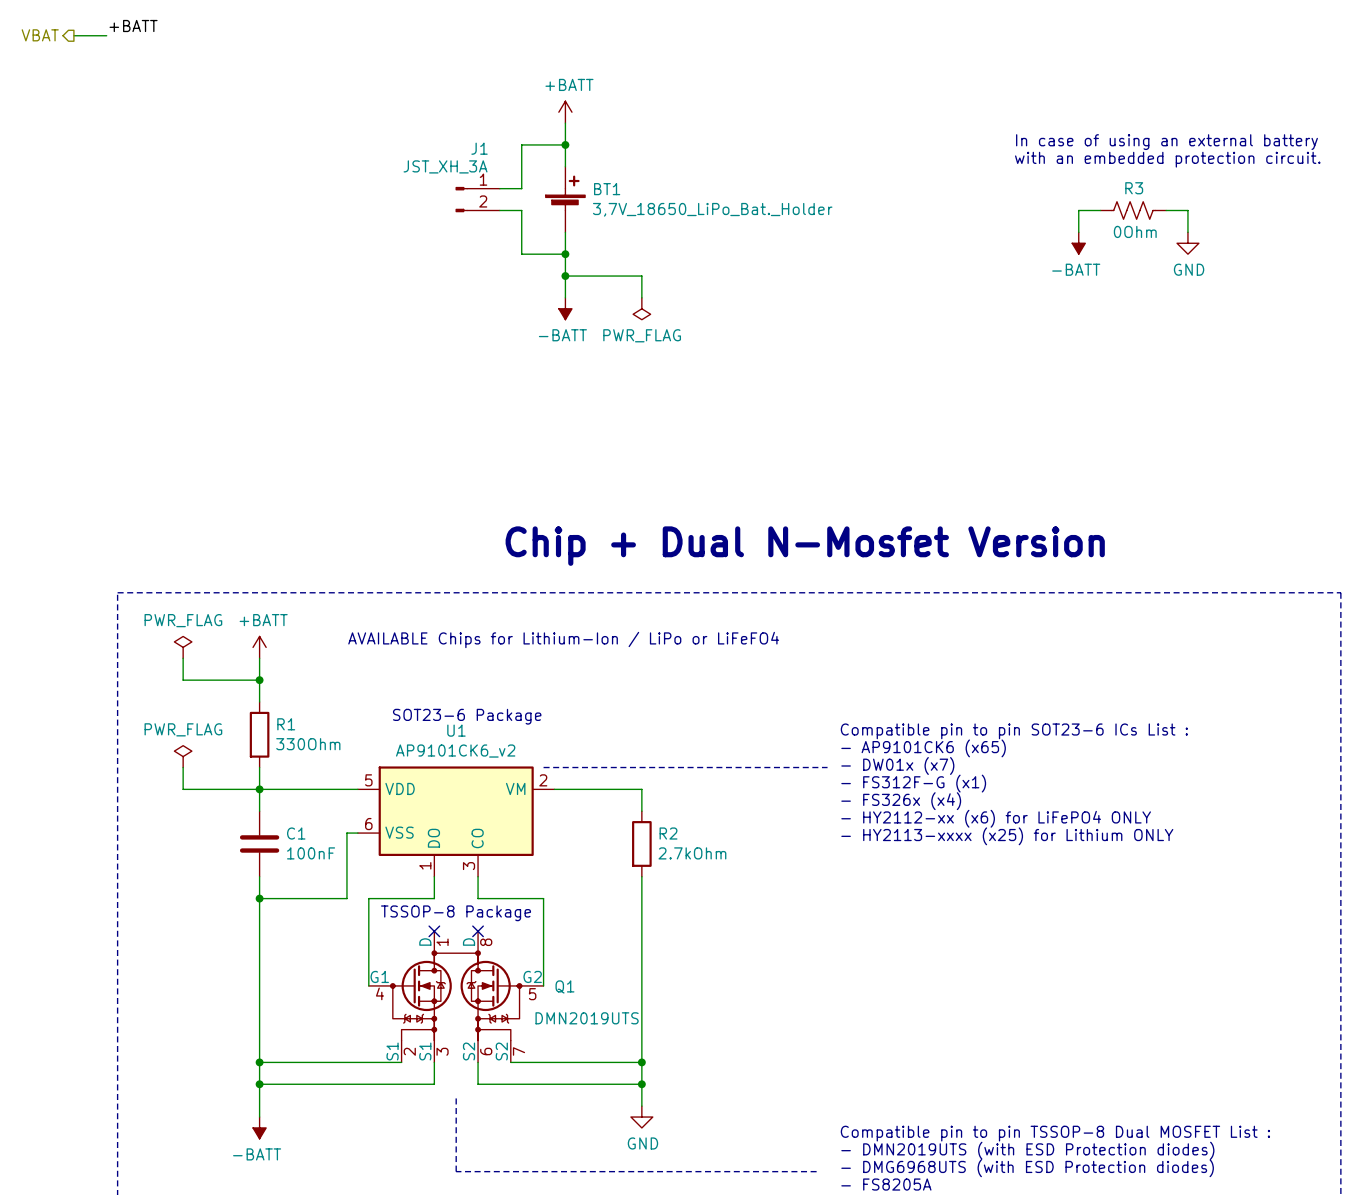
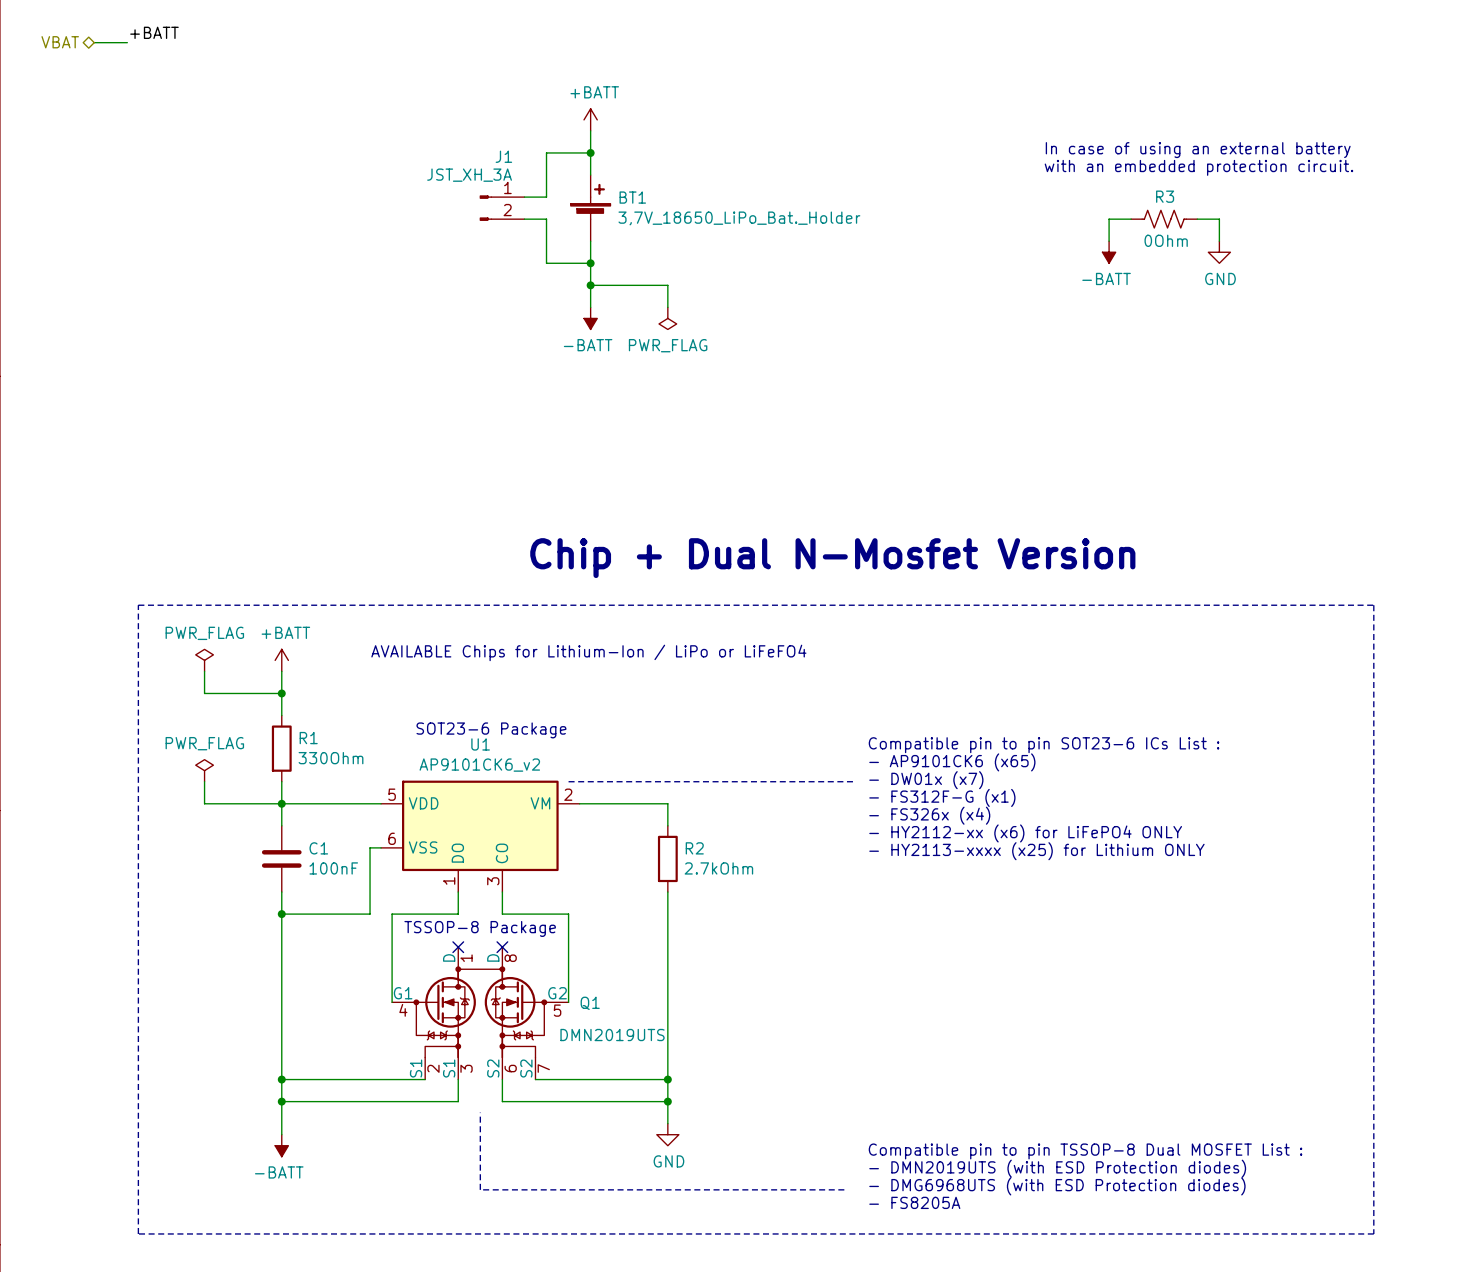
hierarchical label shape: output (40, 35) -> bidirectional (60, 42)

